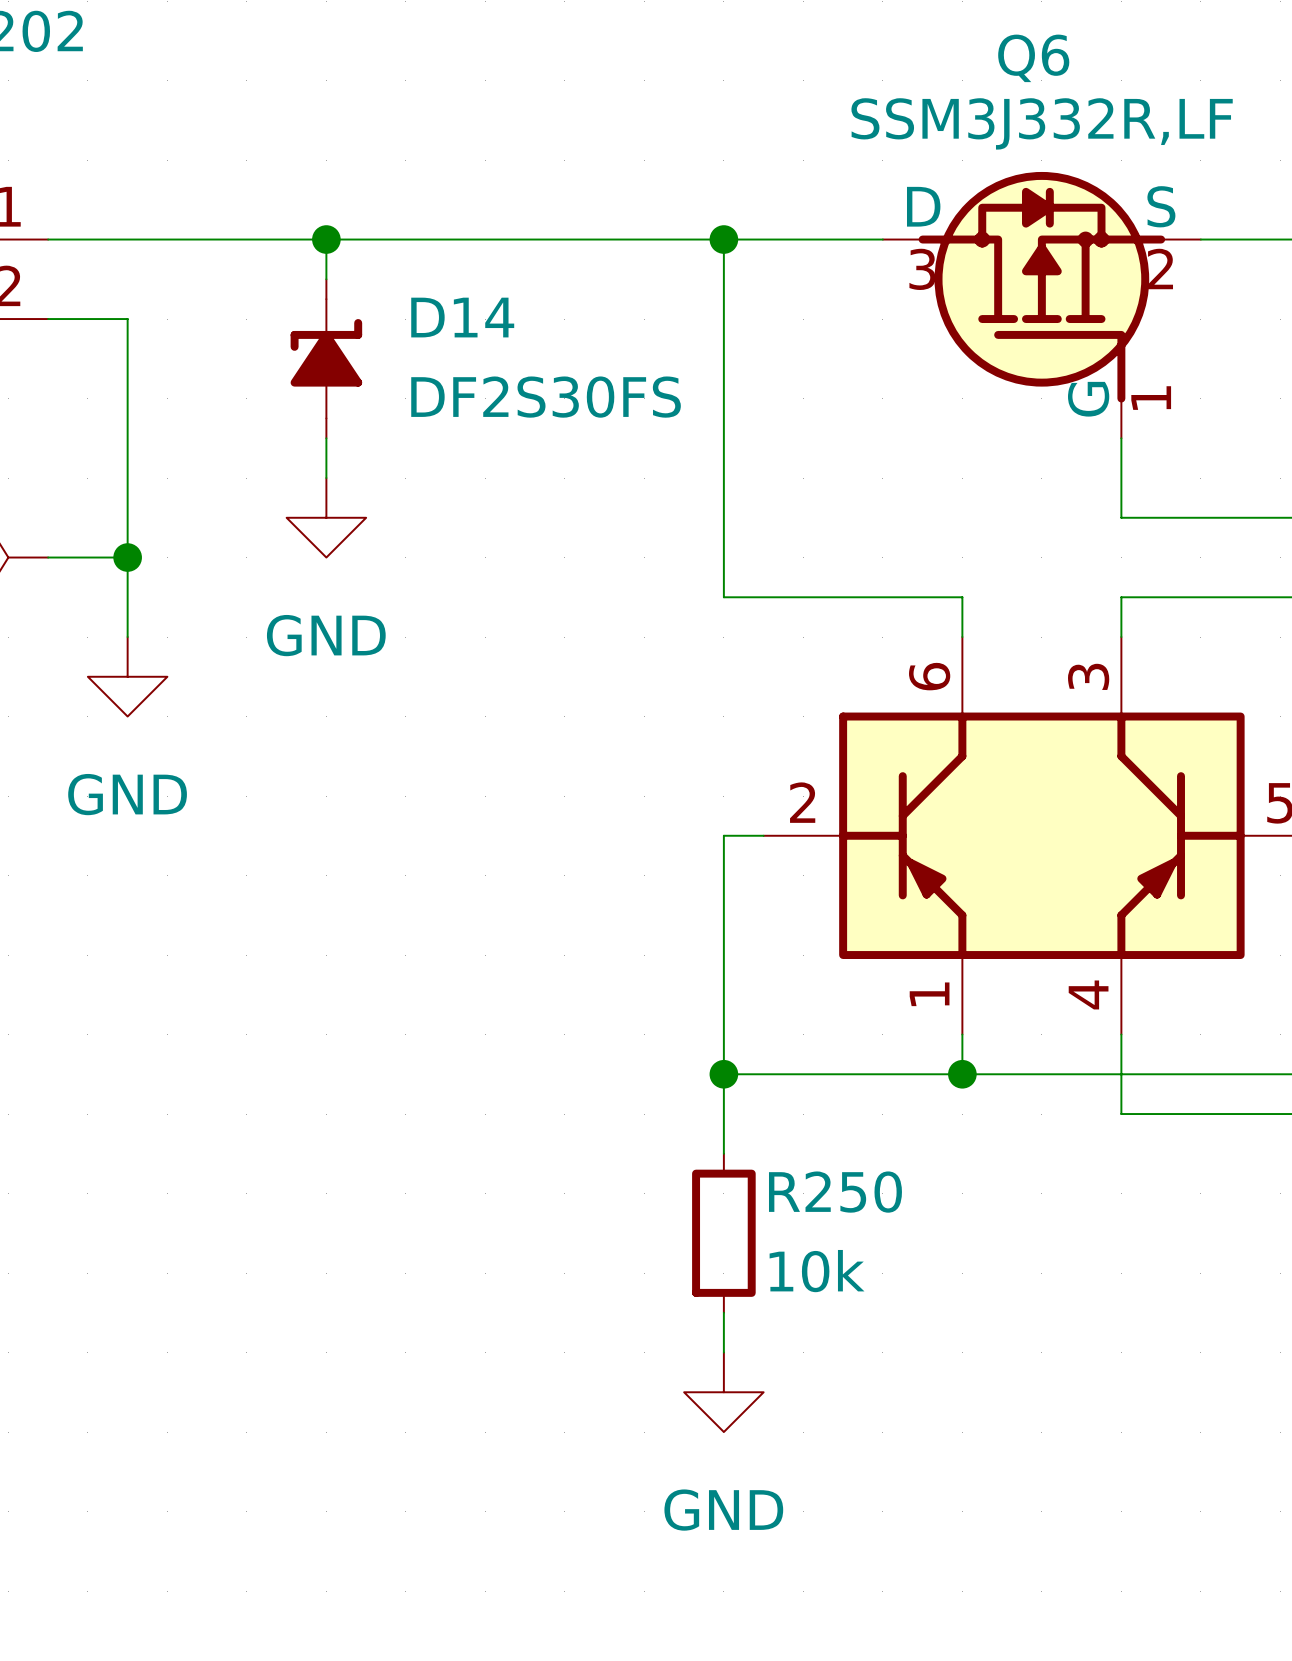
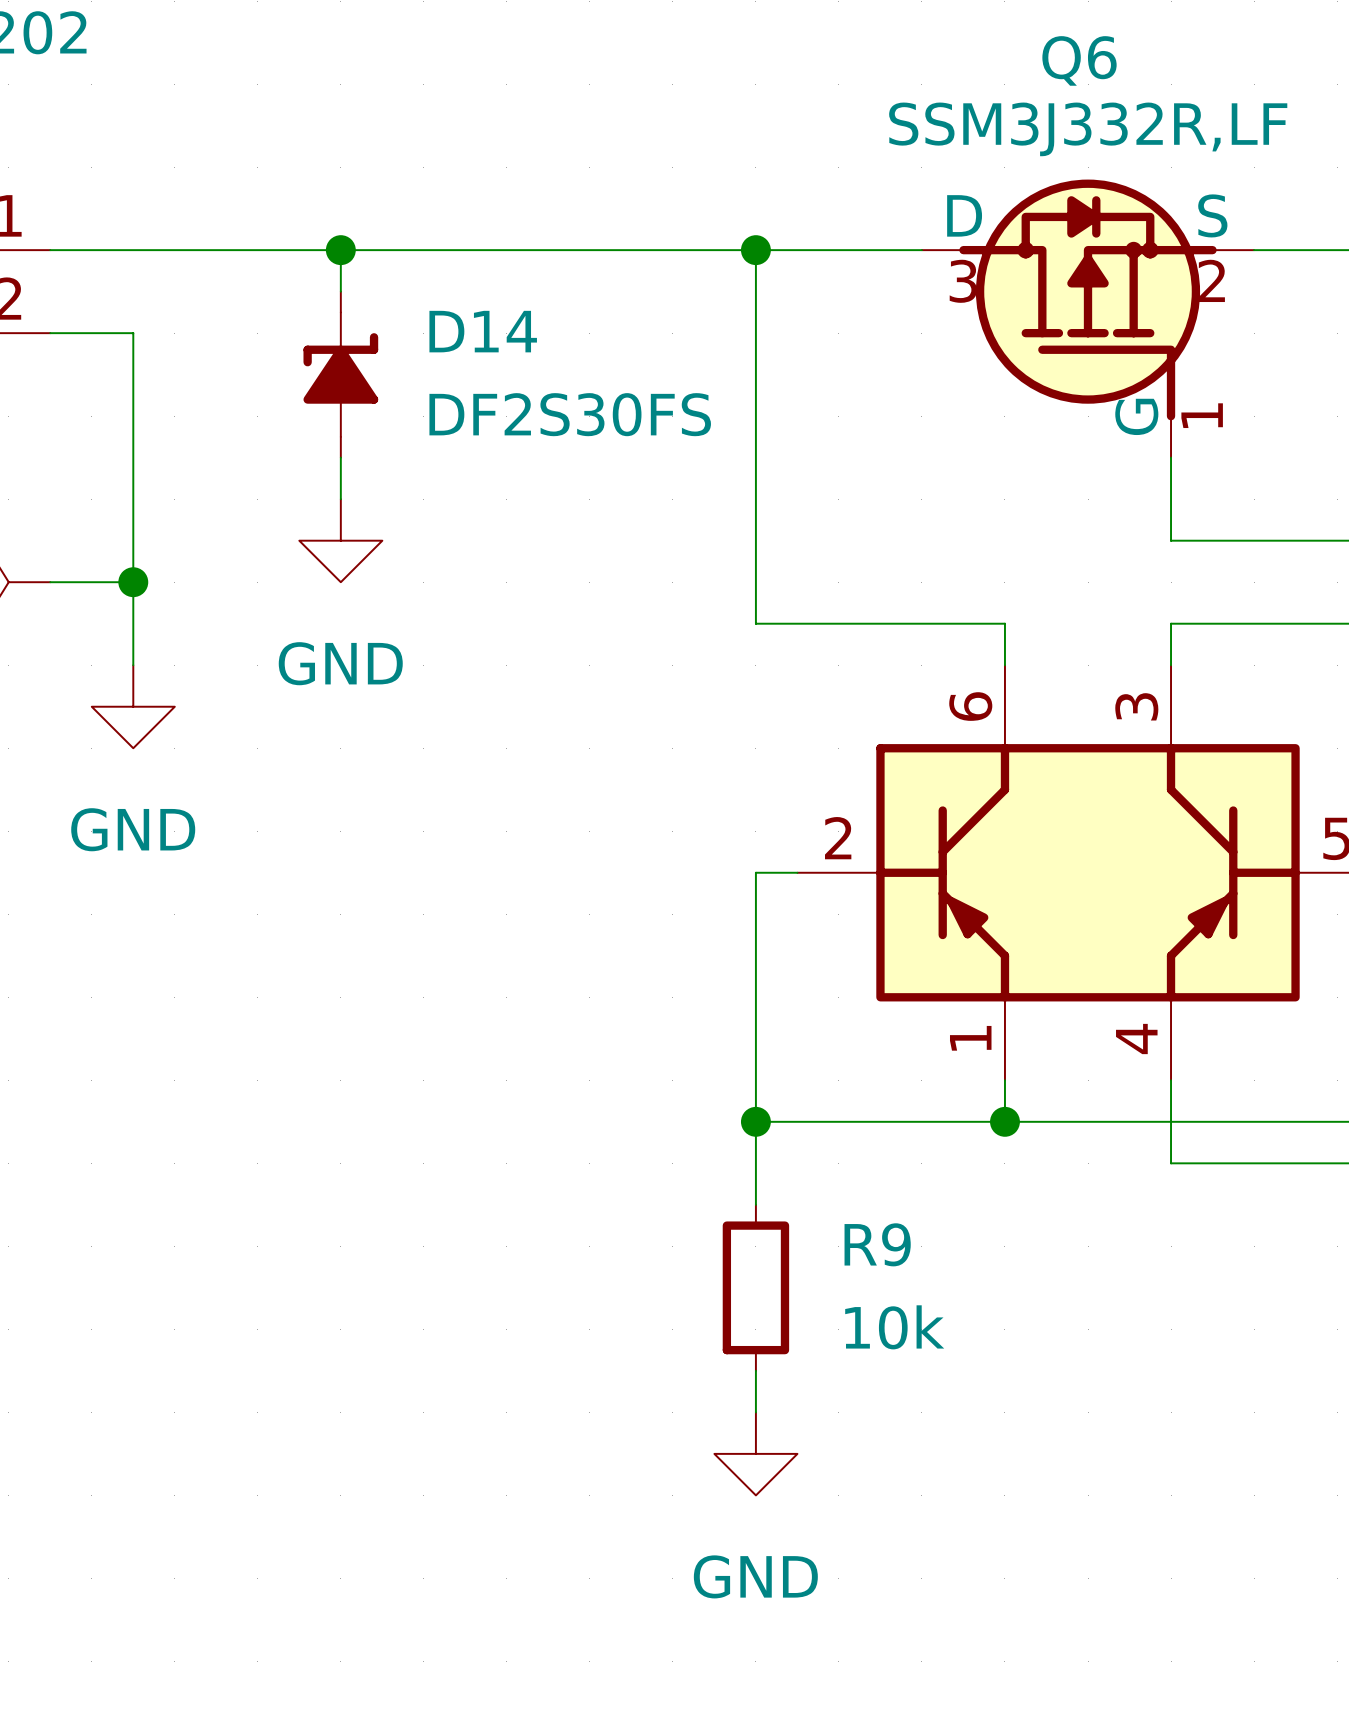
R250 name: R250 (835, 1192) -> R9 (877, 1244)
R250 text position: 10k (817, 1271) -> 10k (894, 1327)

